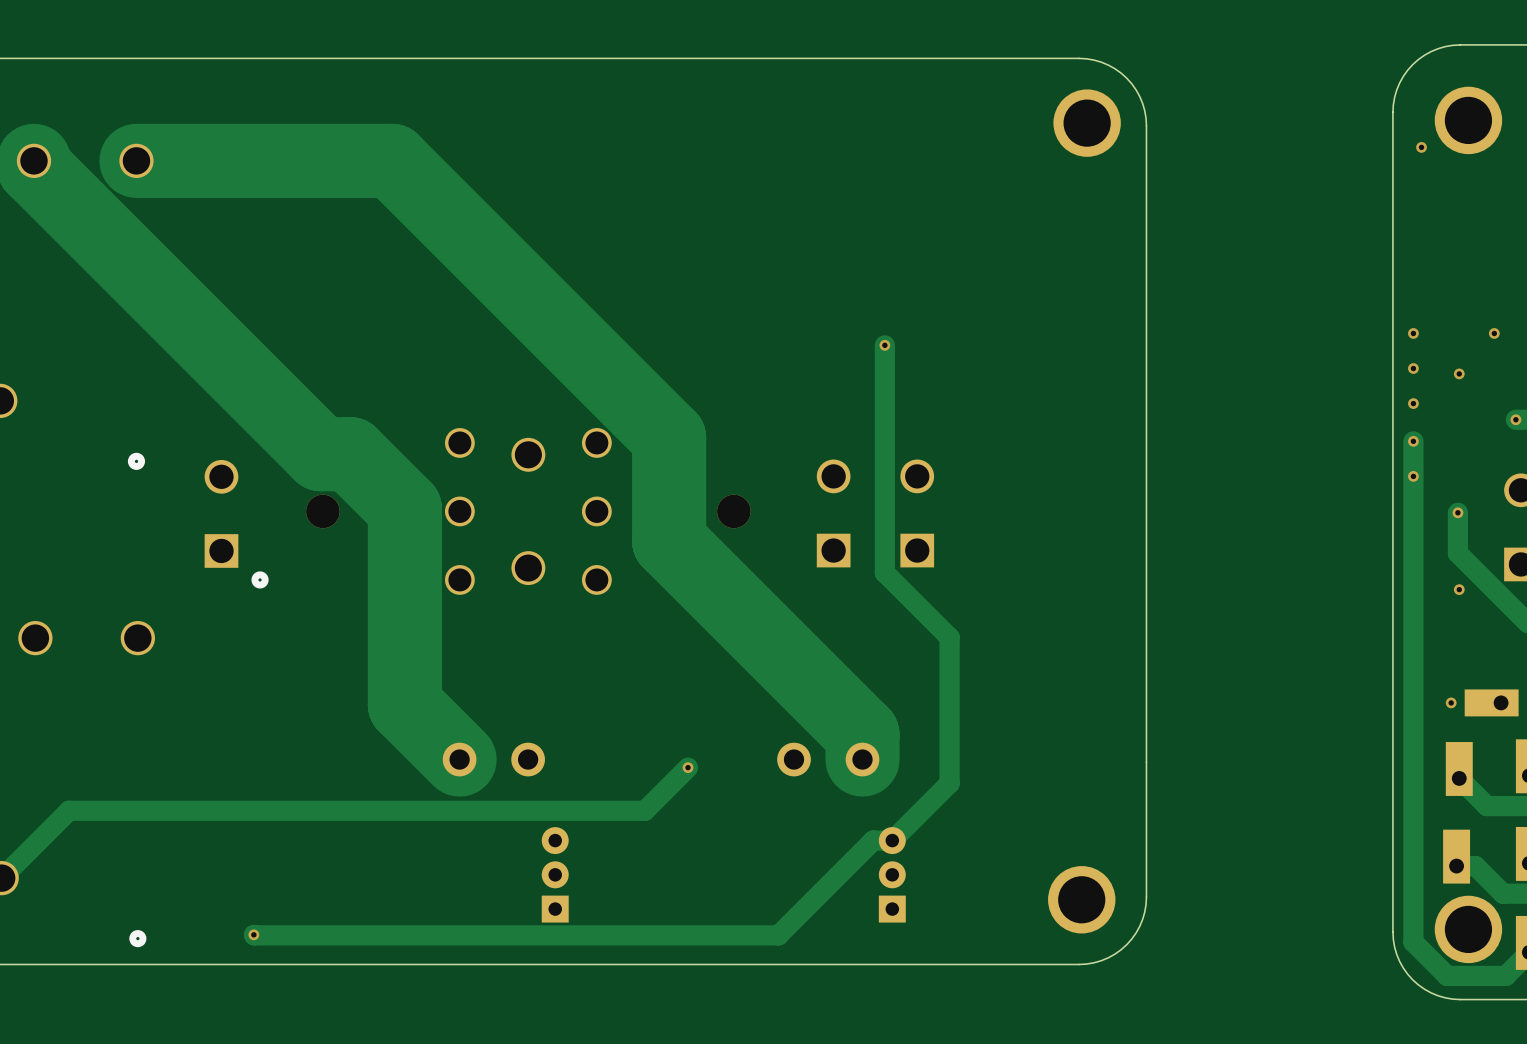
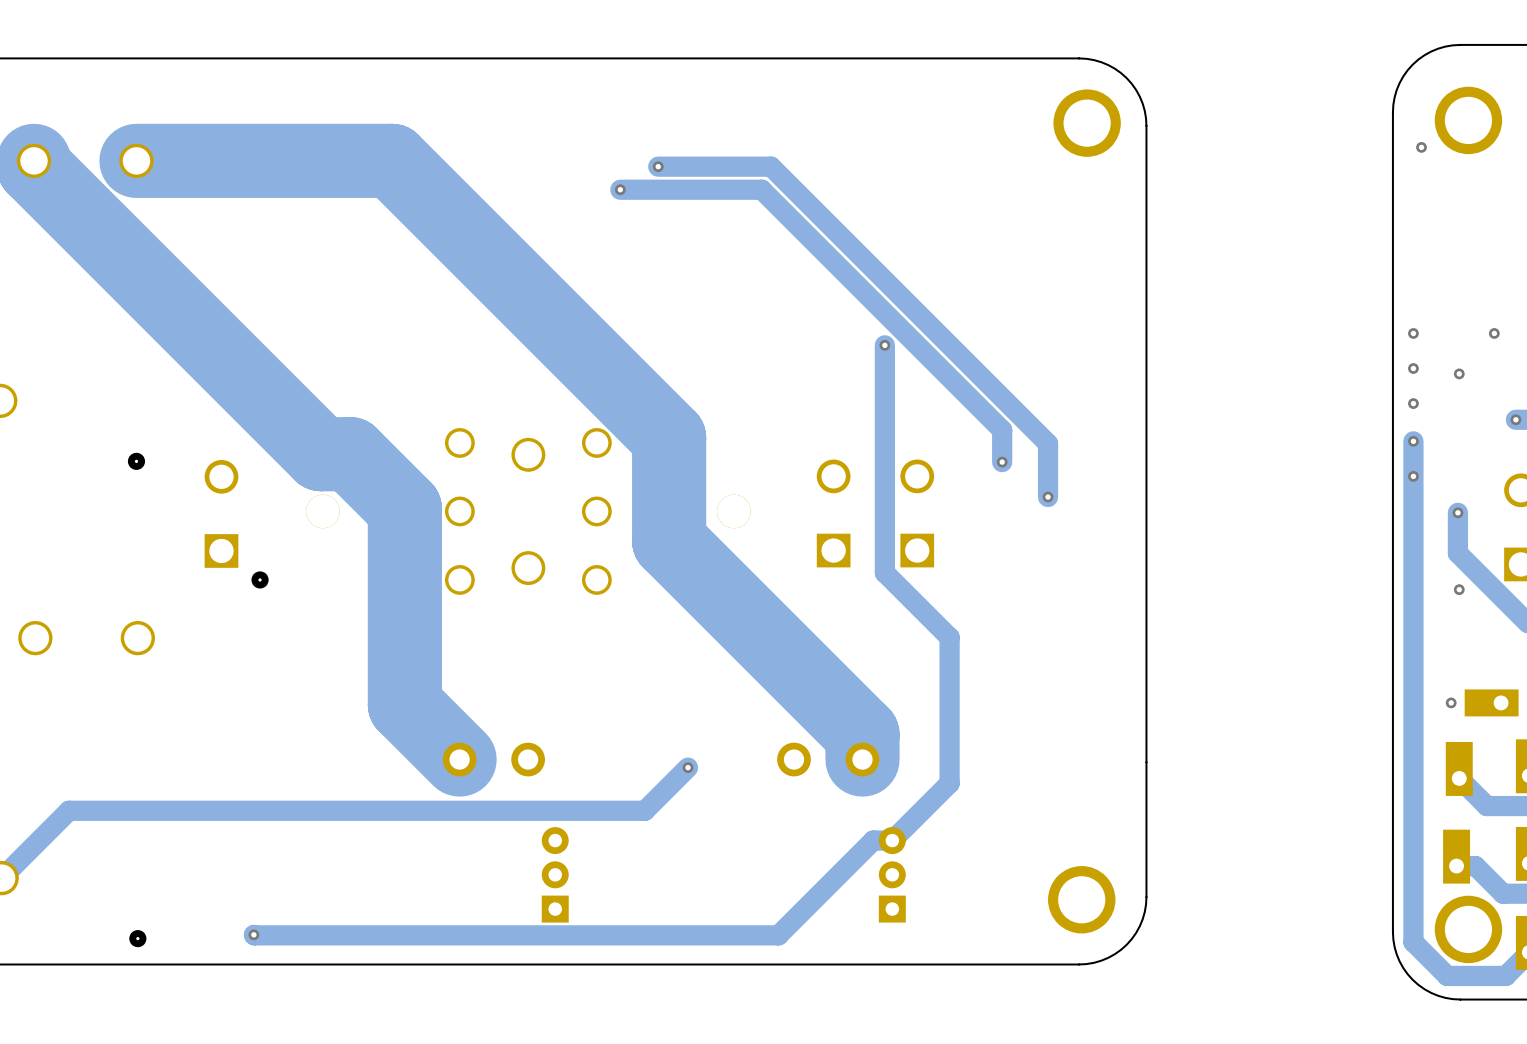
track: none -> (658, 166) (771, 166) (1048, 443) (1048, 497)
via: none -> (658, 166)
track: none -> (620, 189) (761, 189) (1002, 430) (1002, 462)
via: none -> (620, 189)
via: none -> (1002, 462)
via: none -> (1048, 497)

